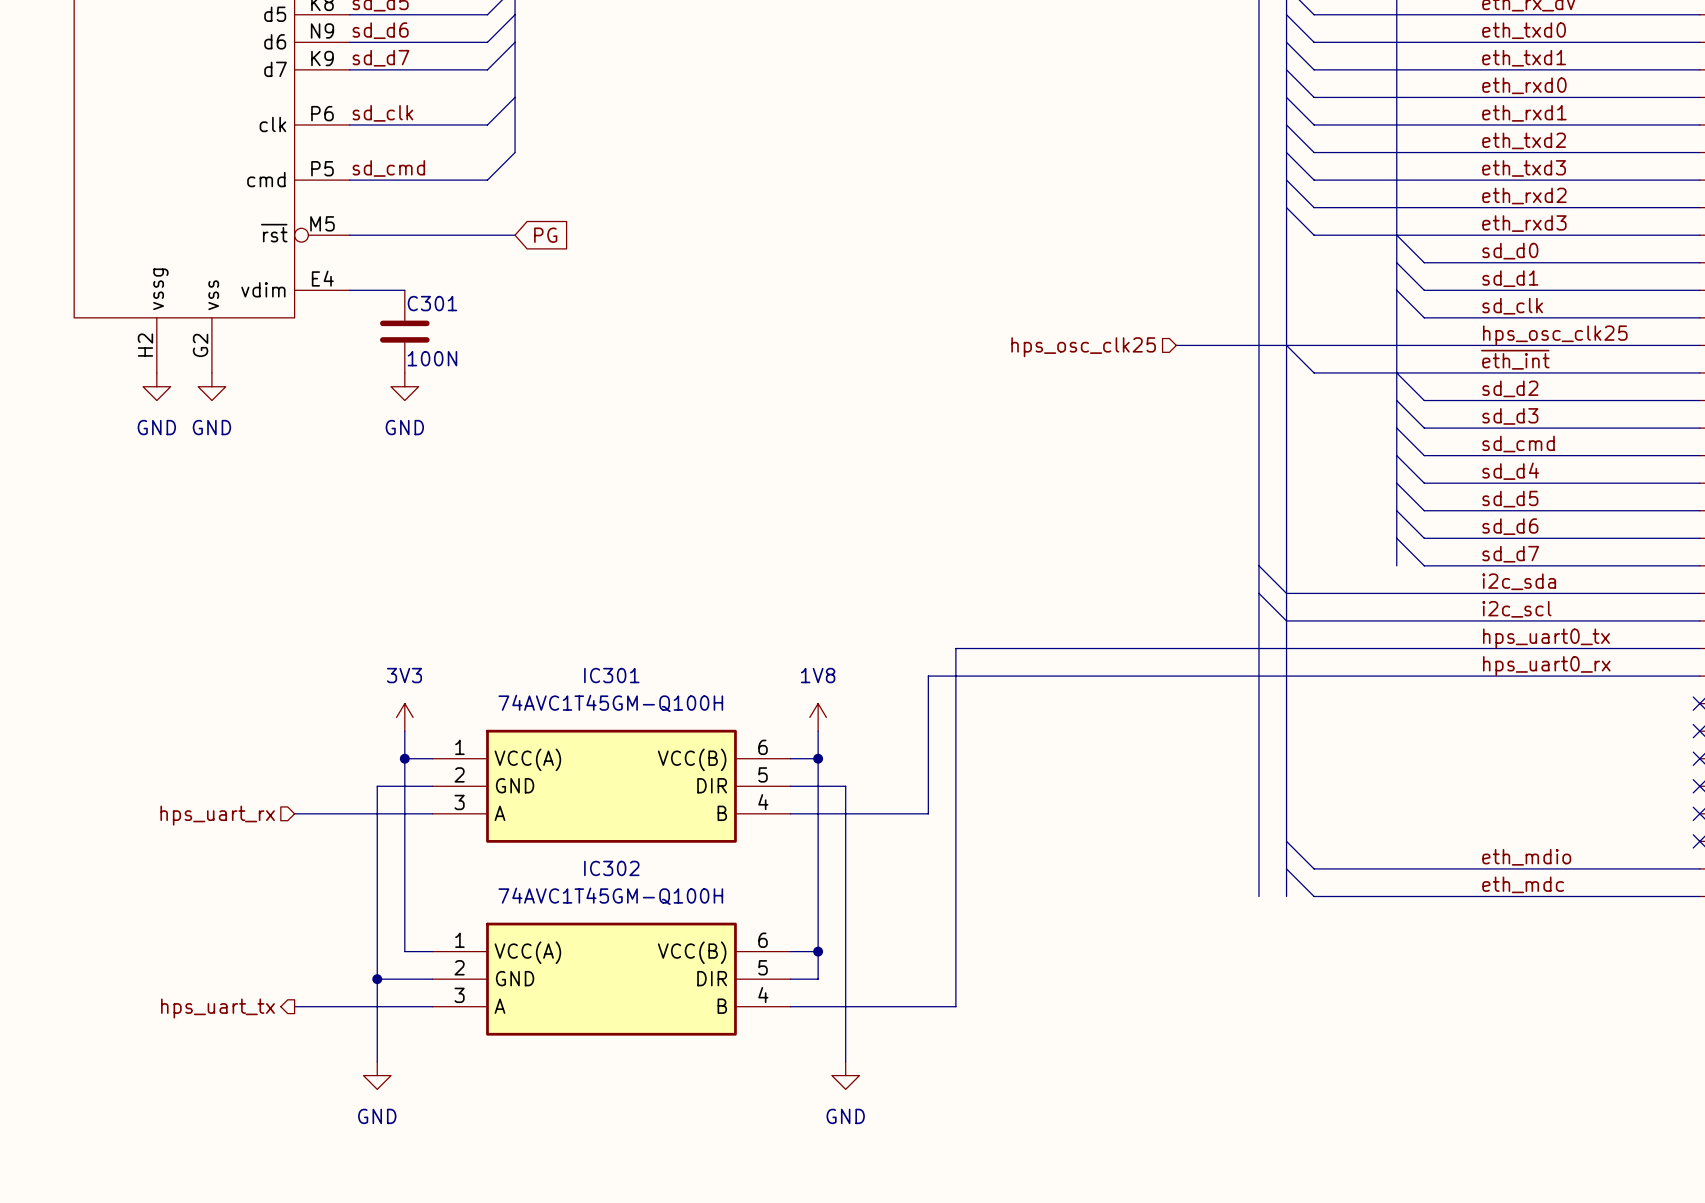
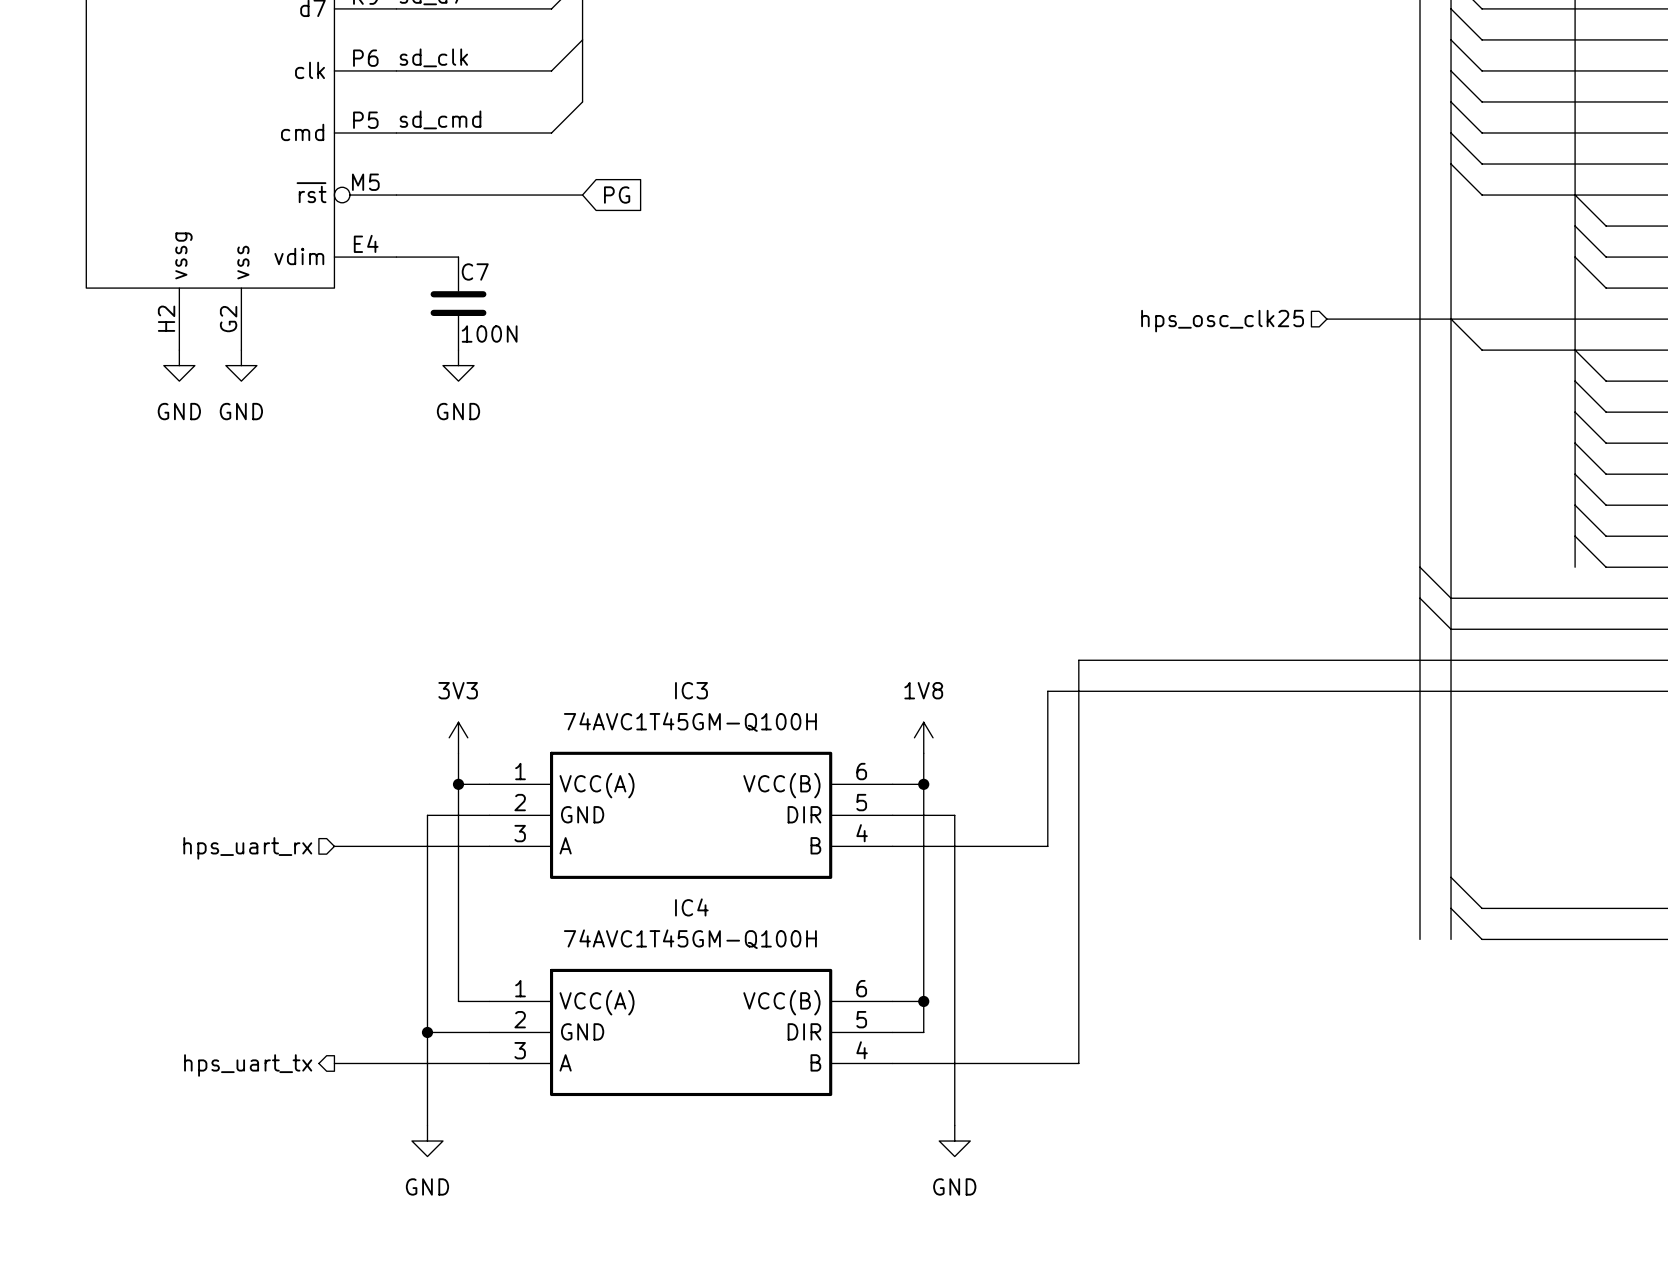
C301 name: C301 (432, 303) -> C7 (475, 271)
IC301 name: IC301 (611, 675) -> IC3 (691, 690)
IC302 name: IC302 (611, 868) -> IC4 (691, 907)

